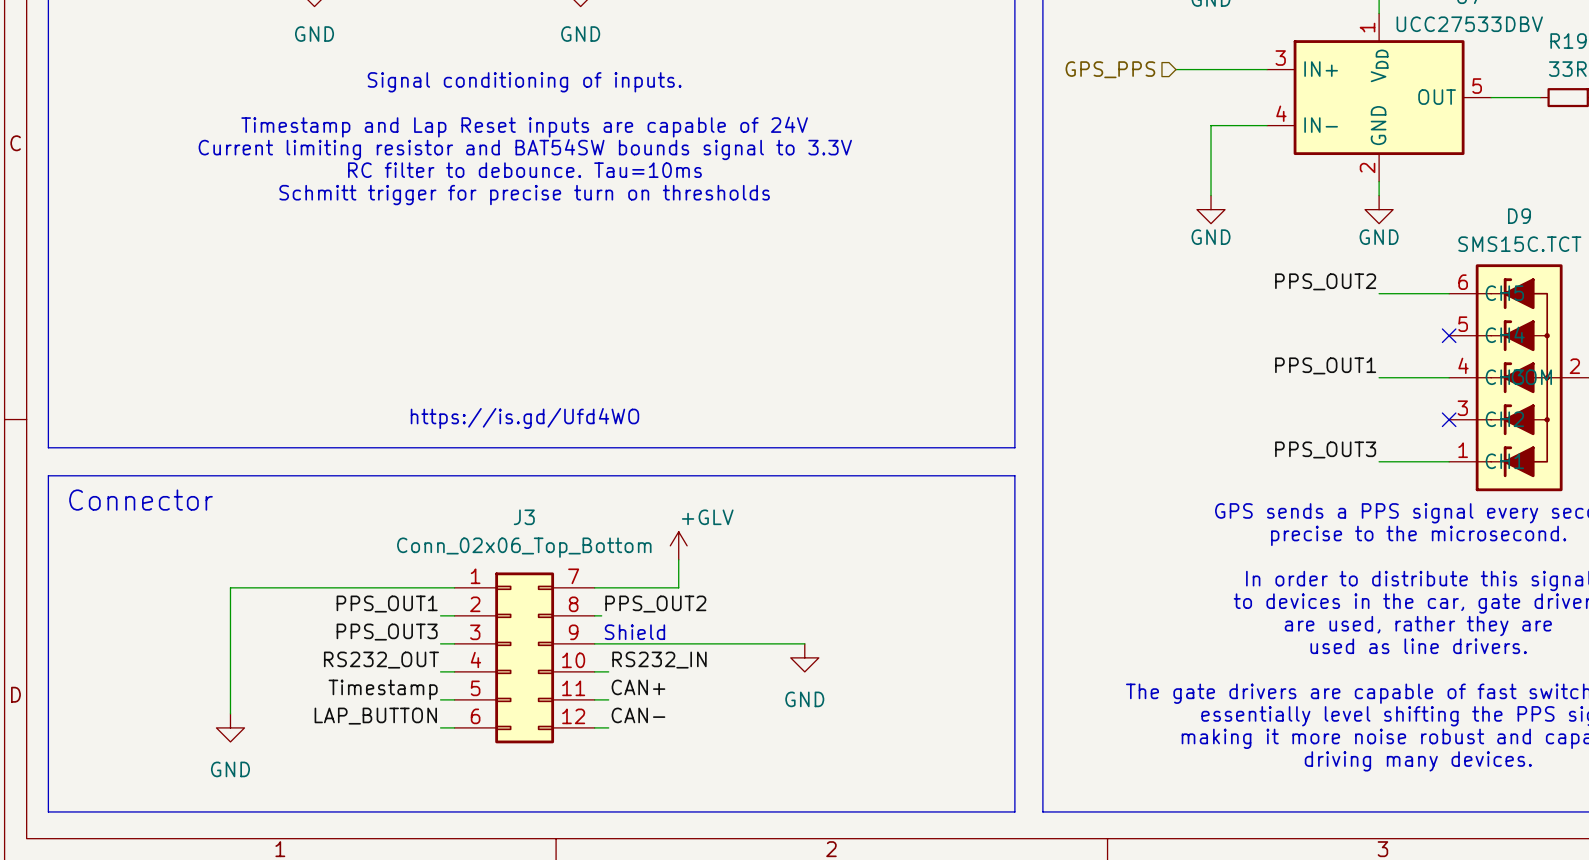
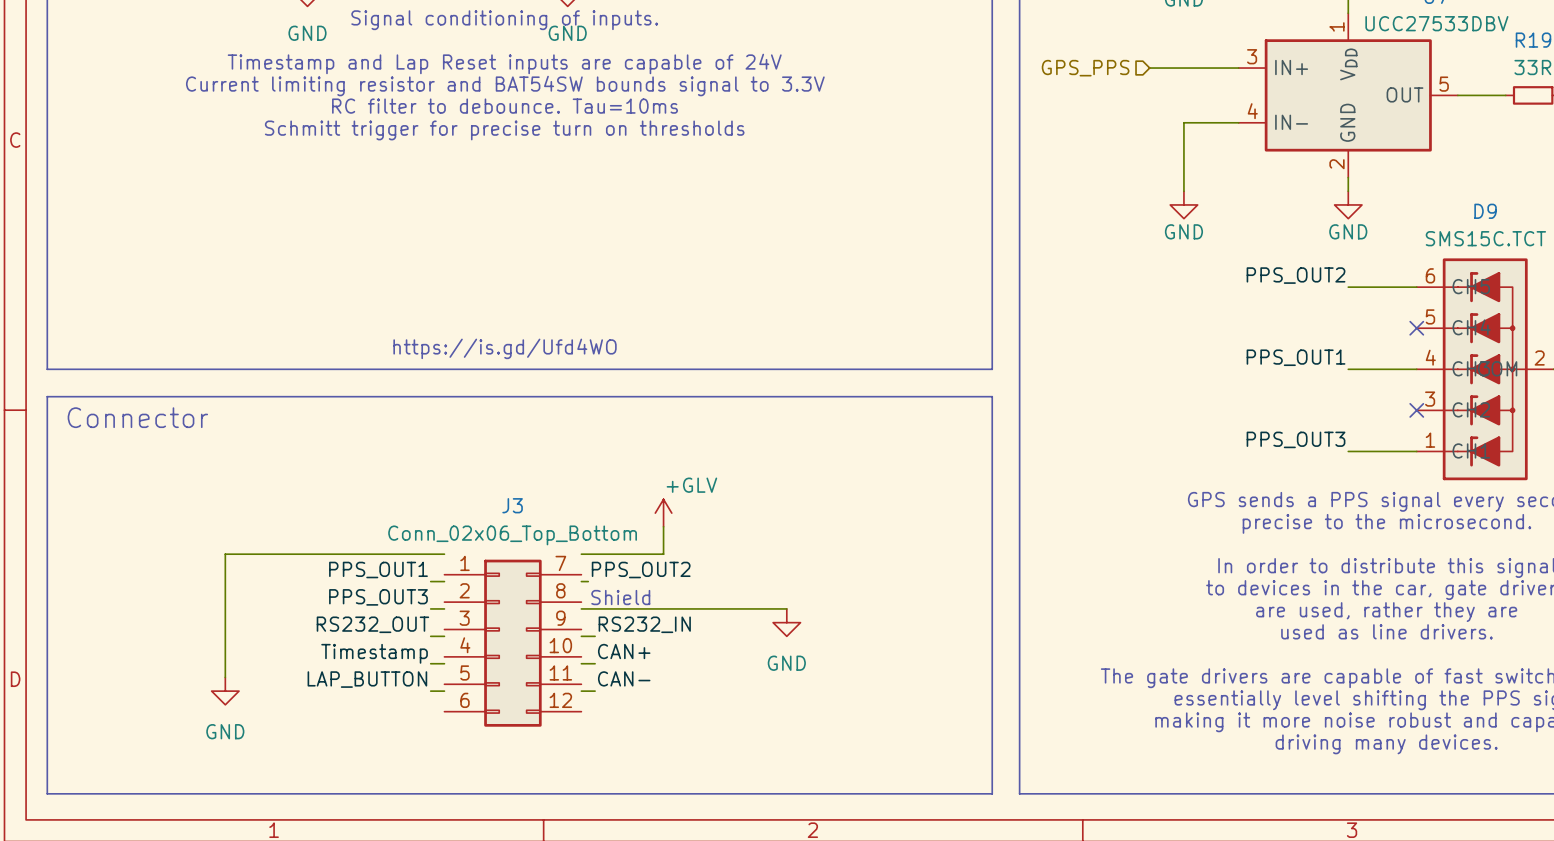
text position: Signal conditioning of inputs. (524, 82) -> Signal conditioning of inputs. (504, 20)
text position: Timestamp and Lap Reset inputs are capable of 24V (524, 127) -> Timestamp and Lap Reset inputs are capable of 24V (504, 63)
text position: Current limiting resistor and BAT54SW bounds signal to 3.3V (525, 149) -> Current limiting resistor and BAT54SW bounds signal to 3.3V (505, 86)
text position: RC filter to debounce. Tau=10ms (524, 170) -> RC filter to debounce. Tau=10ms (505, 106)
text position: Schmitt trigger for precise turn on thresholds (524, 195) -> Schmitt trigger for precise turn on thresholds (504, 130)
line: (48, 377) (48, 405) -> (47, 369) (992, 369)
line: (1014, 377) (1014, 405) -> (47, 396) (992, 396)
text position: https://is.gd/Ufd4WO (524, 418) -> https://is.gd/Ufd4WO (505, 348)
line: (48, 447) (1014, 447) -> (47, 437) (47, 465)
line: (48, 475) (1014, 475) -> (992, 437) (992, 465)
text position: Connector (141, 500) -> Connector (137, 417)
power symbol position: +GLV (678, 545) -> +GLV (663, 513)
wire: (678, 566) (678, 587) (594, 587) -> (663, 554) (581, 554)
wire: (230, 587) (454, 587) -> (225, 574) (225, 554) (444, 554)
label position: PPS_OUT1 (387, 604) -> PPS_OUT1 (378, 570)
label position: PPS_OUT2 (655, 604) -> PPS_OUT2 (641, 570)
wire: (440, 615) (454, 615) -> (430, 581) (444, 581)
wire: (594, 615) (601, 615) -> (581, 581) (588, 581)
label position: PPS_OUT3 (387, 632) -> PPS_OUT3 (378, 597)
text position: Shield (634, 632) -> Shield (620, 597)
wire: (440, 643) (454, 643) -> (430, 608) (444, 608)
wire: (594, 643) (804, 643) -> (581, 608) (786, 608)
power symbol position: GND (804, 657) -> GND (786, 622)
label position: RS232_OUT (381, 660) -> RS232_OUT (372, 624)
label position: RS232_IN (659, 660) -> RS232_IN (644, 624)
wire: (440, 671) (454, 671) -> (430, 636) (444, 636)
wire: (594, 671) (608, 671) -> (581, 636) (595, 636)
label position: CAN+ (638, 687) -> CAN+ (624, 651)
label position: Timestamp (383, 689) -> Timestamp (374, 653)
wire: (440, 699) (454, 699) -> (430, 663) (444, 663)
wire: (594, 699) (608, 699) -> (581, 663) (595, 663)
label position: CAN- (638, 715) -> CAN- (624, 678)
label position: LAP_BUTTON (375, 716) -> LAP_BUTTON (367, 679)
power symbol position: GND (230, 727) -> GND (225, 691)
wire: (440, 727) (454, 727) -> (430, 691) (444, 691)
wire: (594, 727) (608, 727) -> (581, 691) (595, 691)

